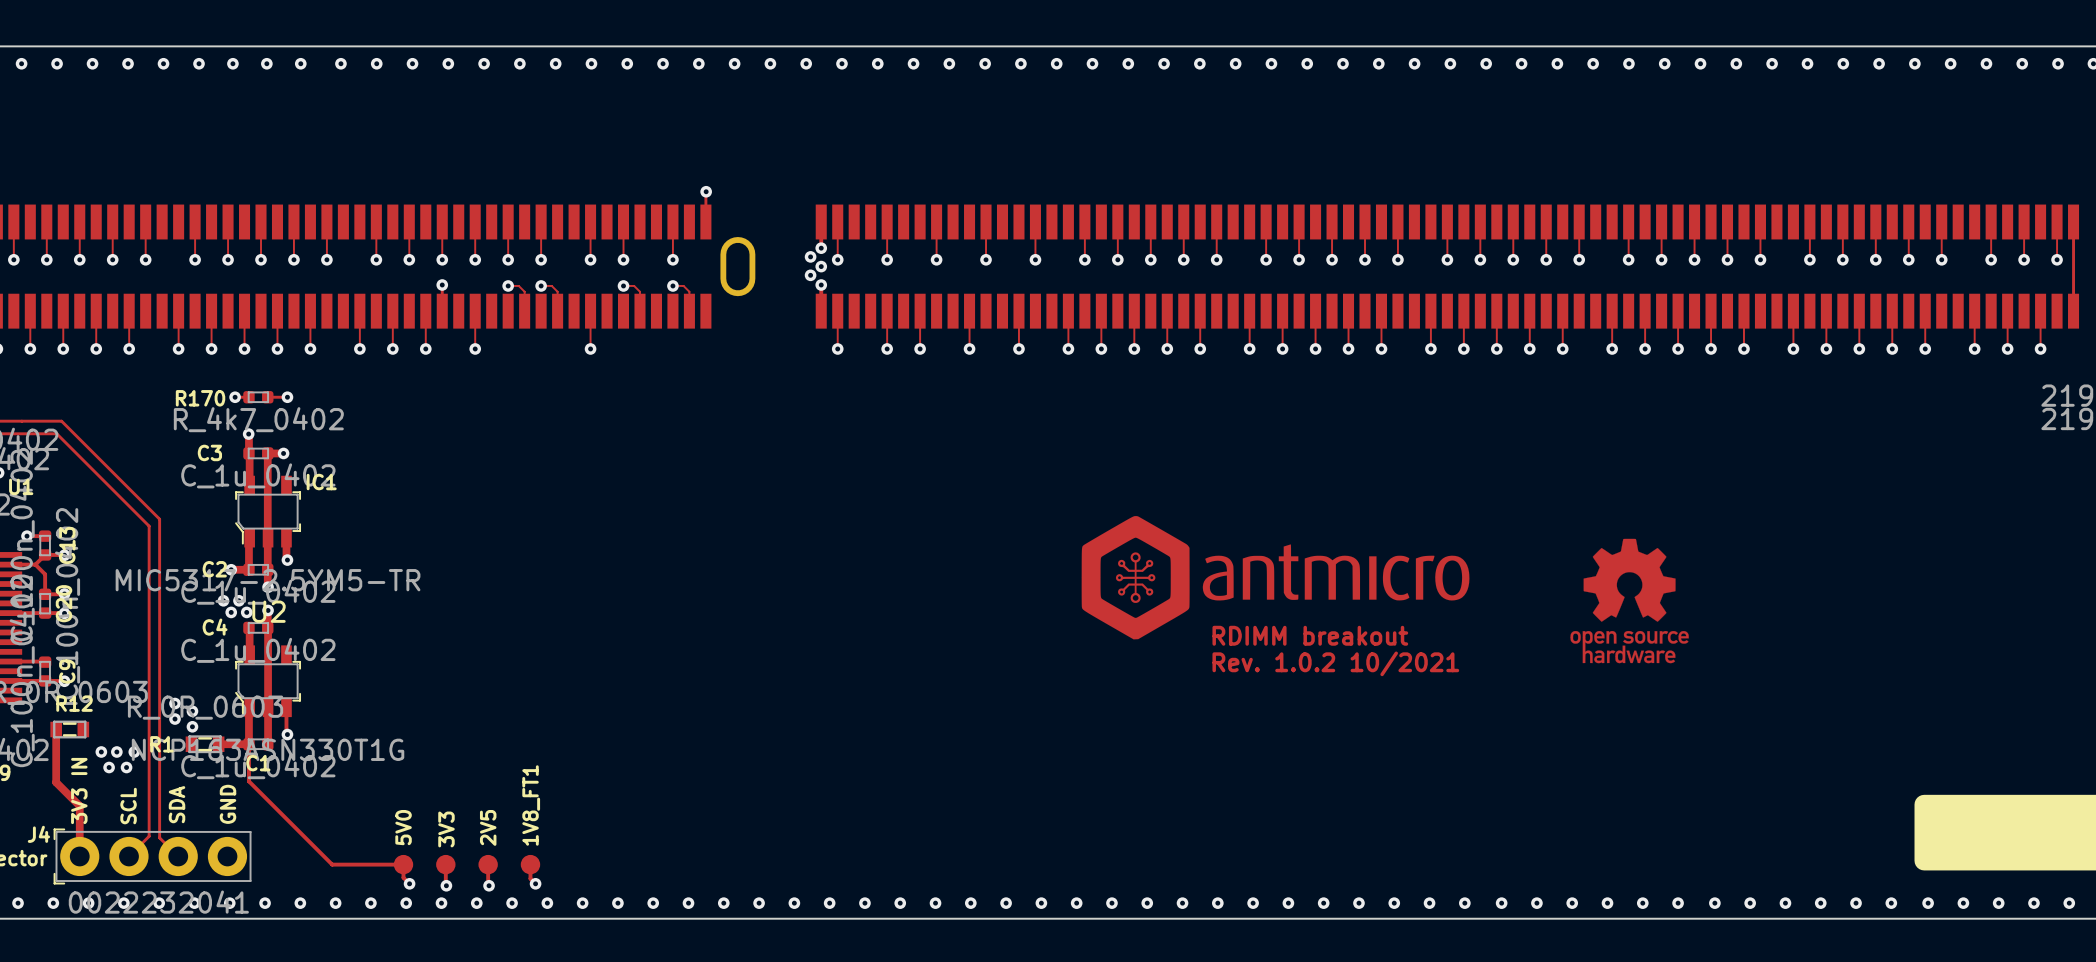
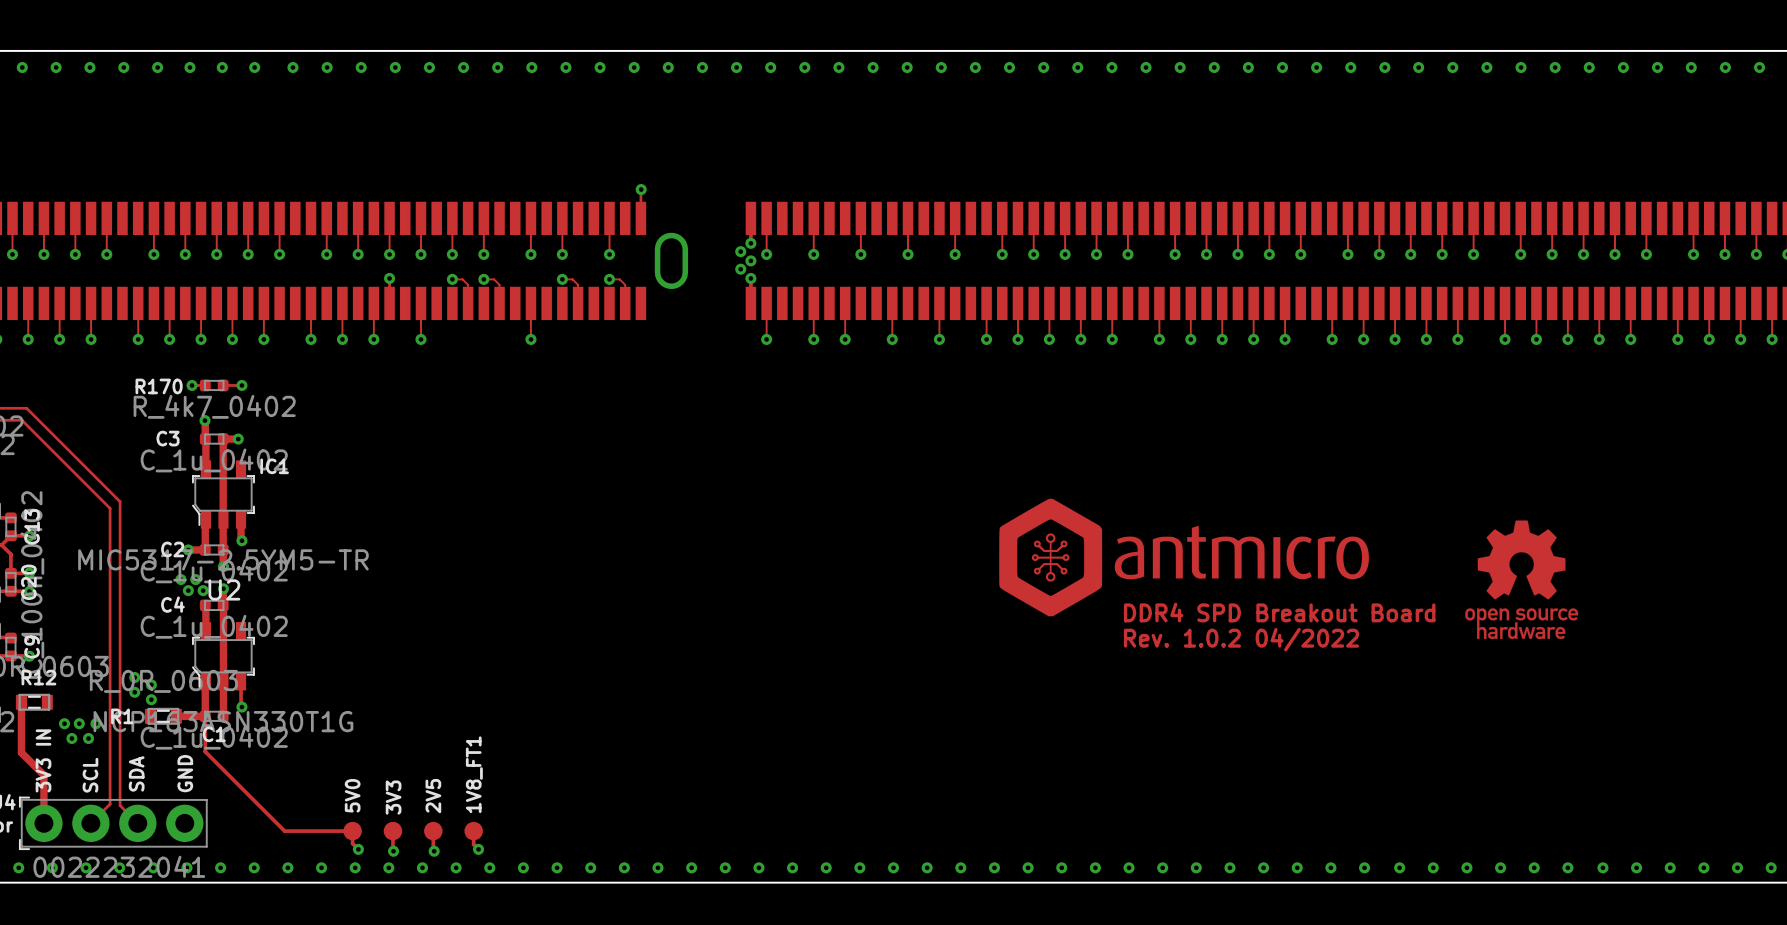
text: RDIMM breakout (1310, 635) -> DDR4 SPD Breakout Board (1279, 612)
text: Rev. 1.0.2 10/2021 (1335, 663) -> Rev. 1.0.2 04/2022 (1241, 639)

